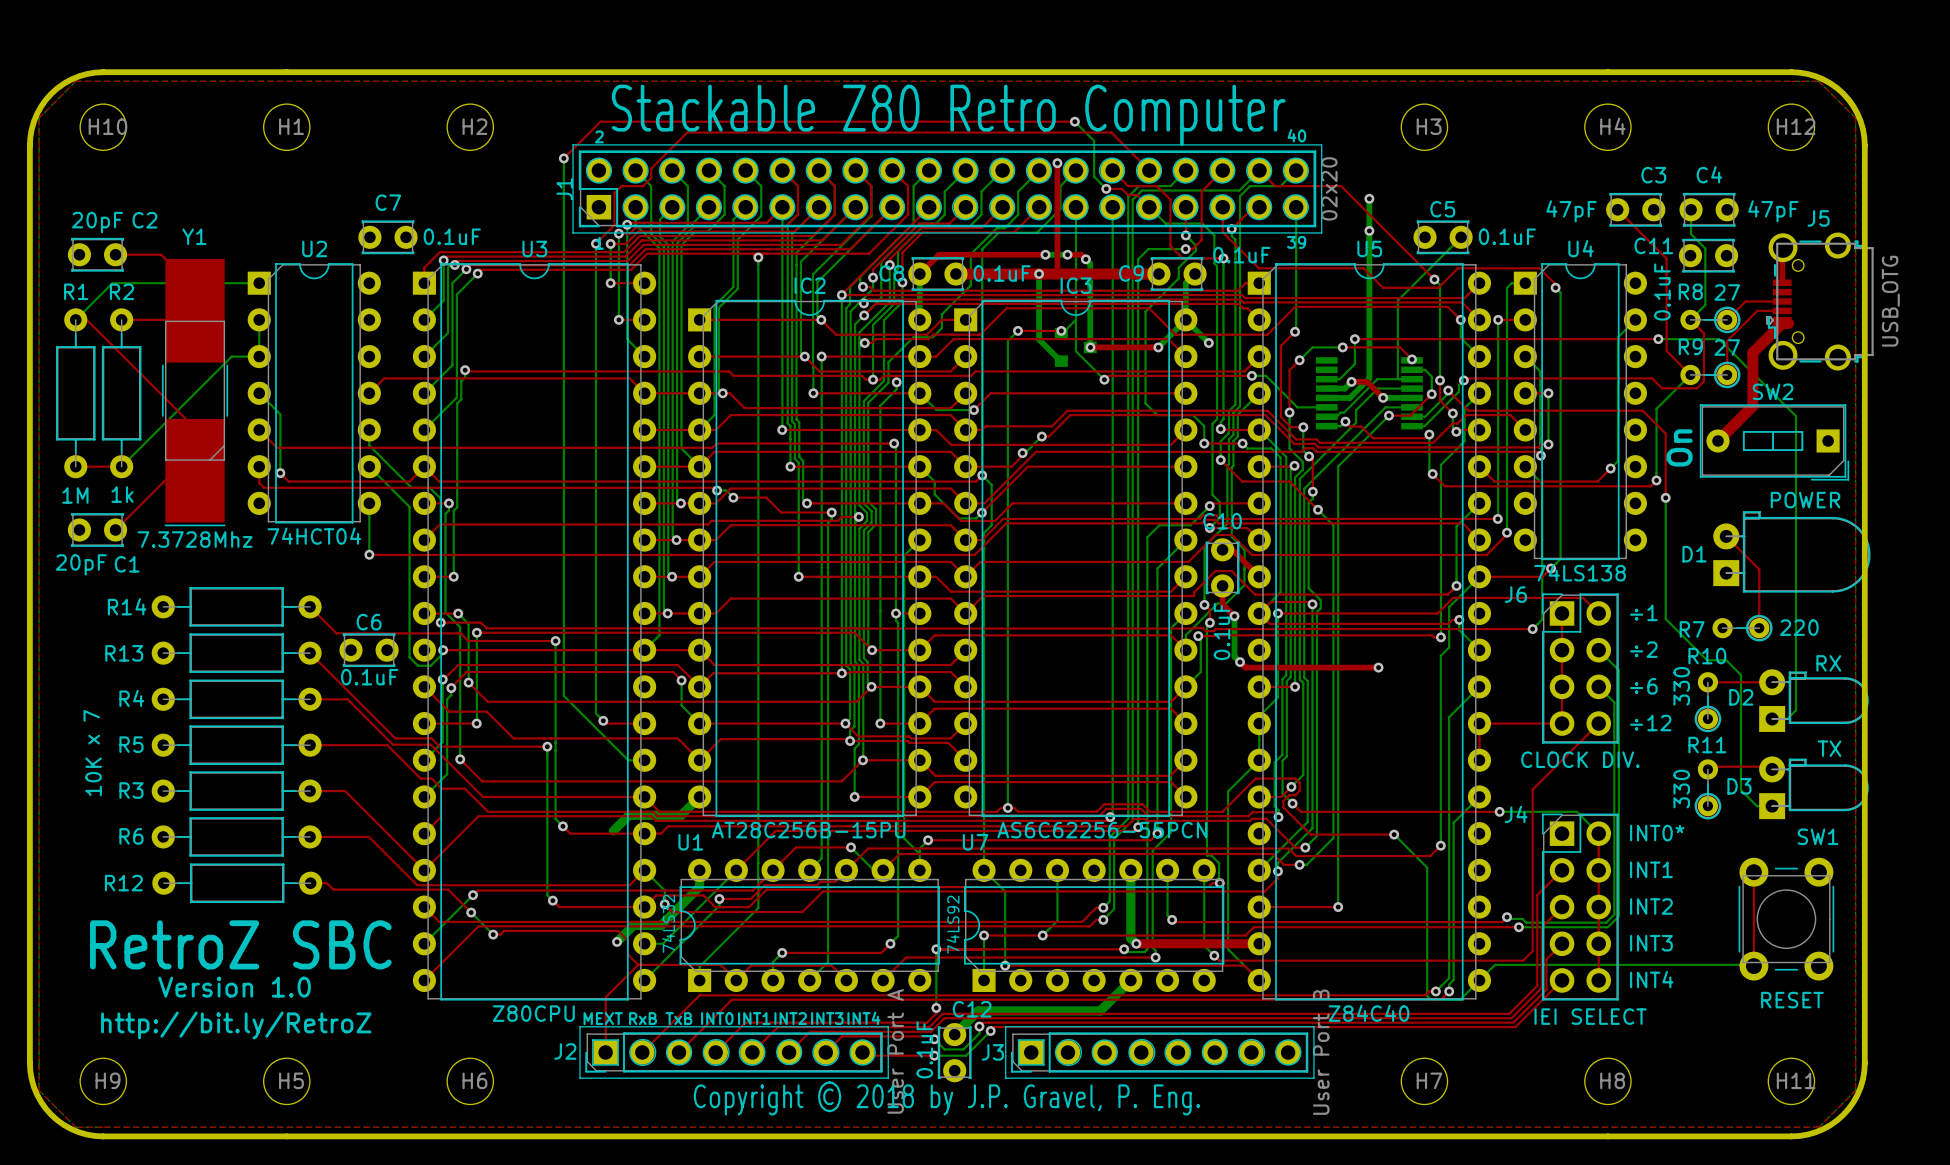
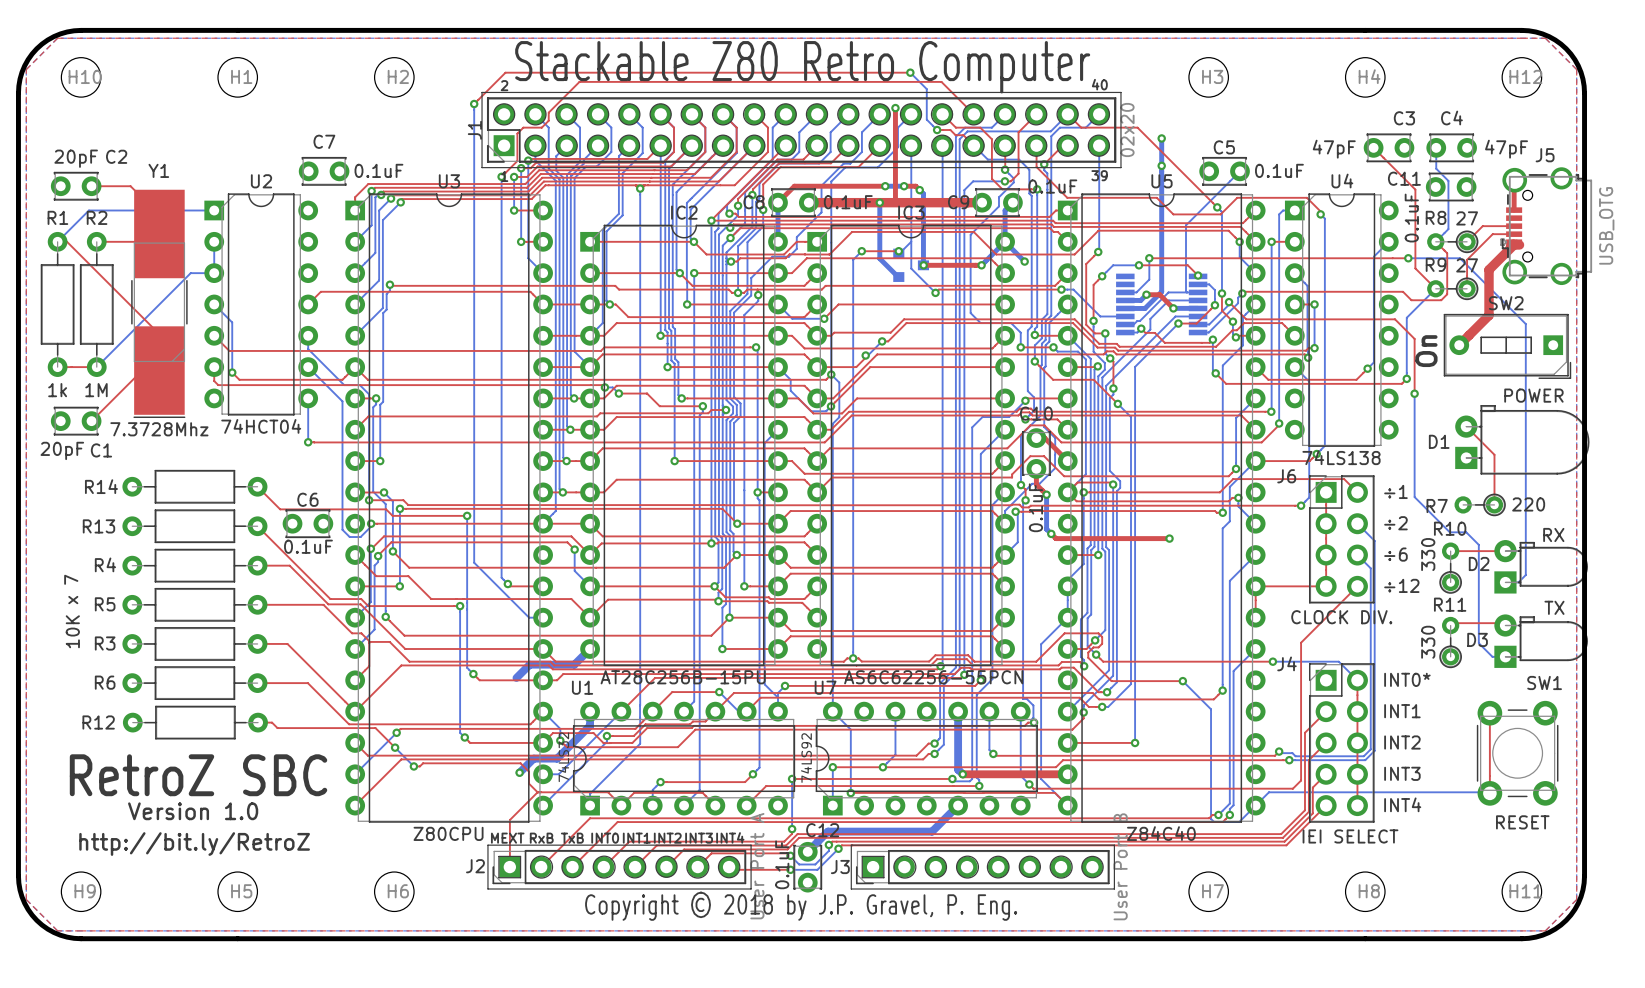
R2 value position: 1k (122, 494) -> 1k (57, 390)
R1 value position: 1M (75, 495) -> 1M (96, 390)

